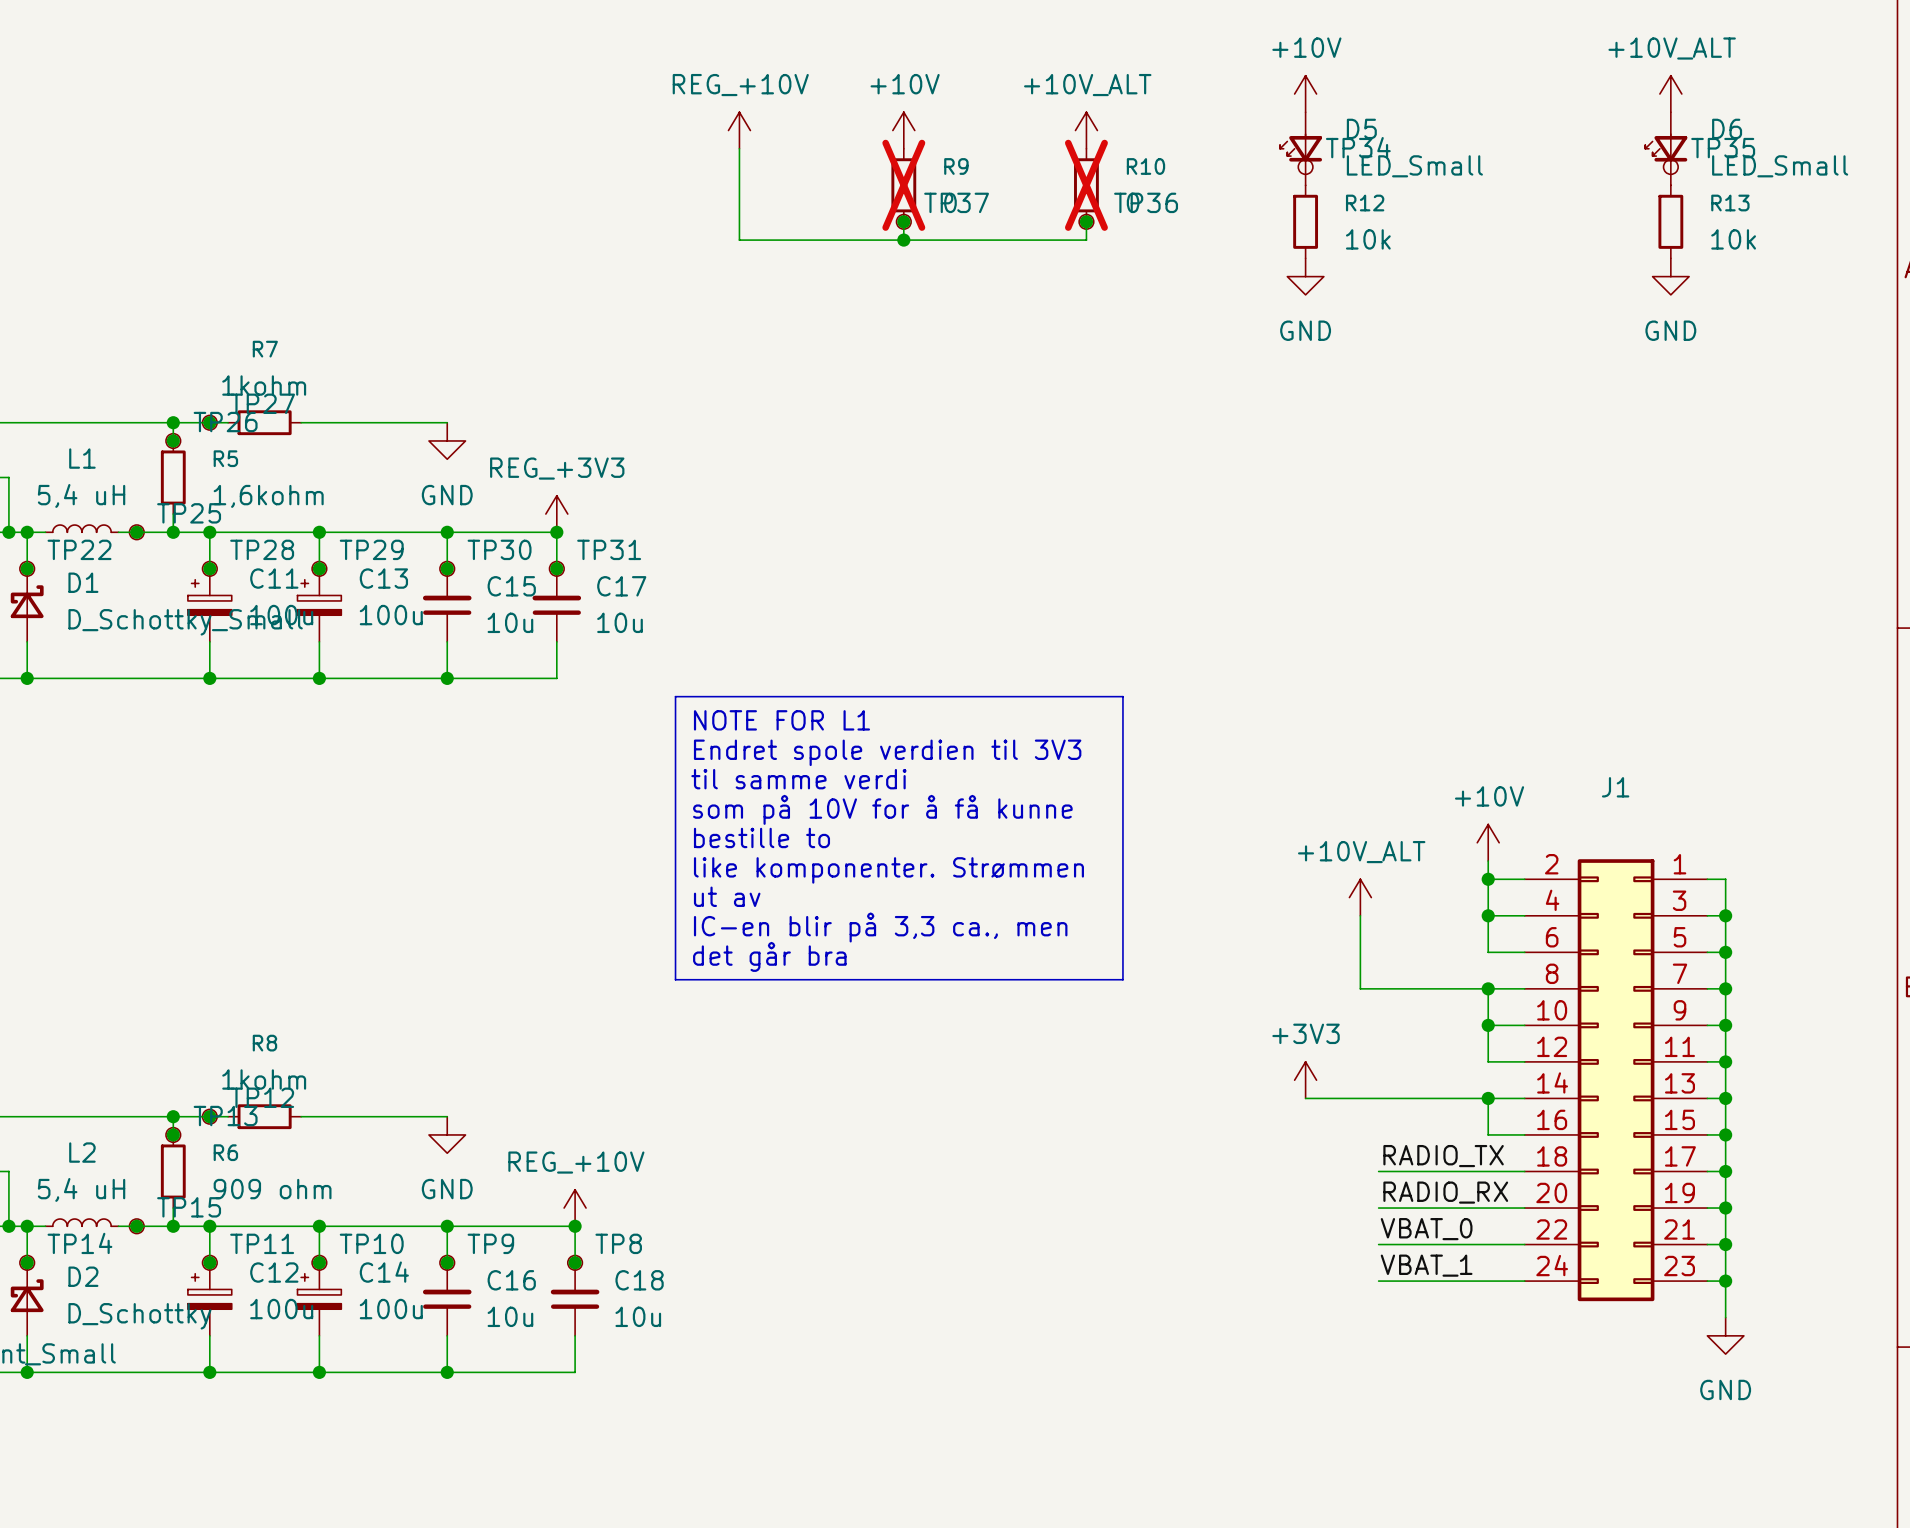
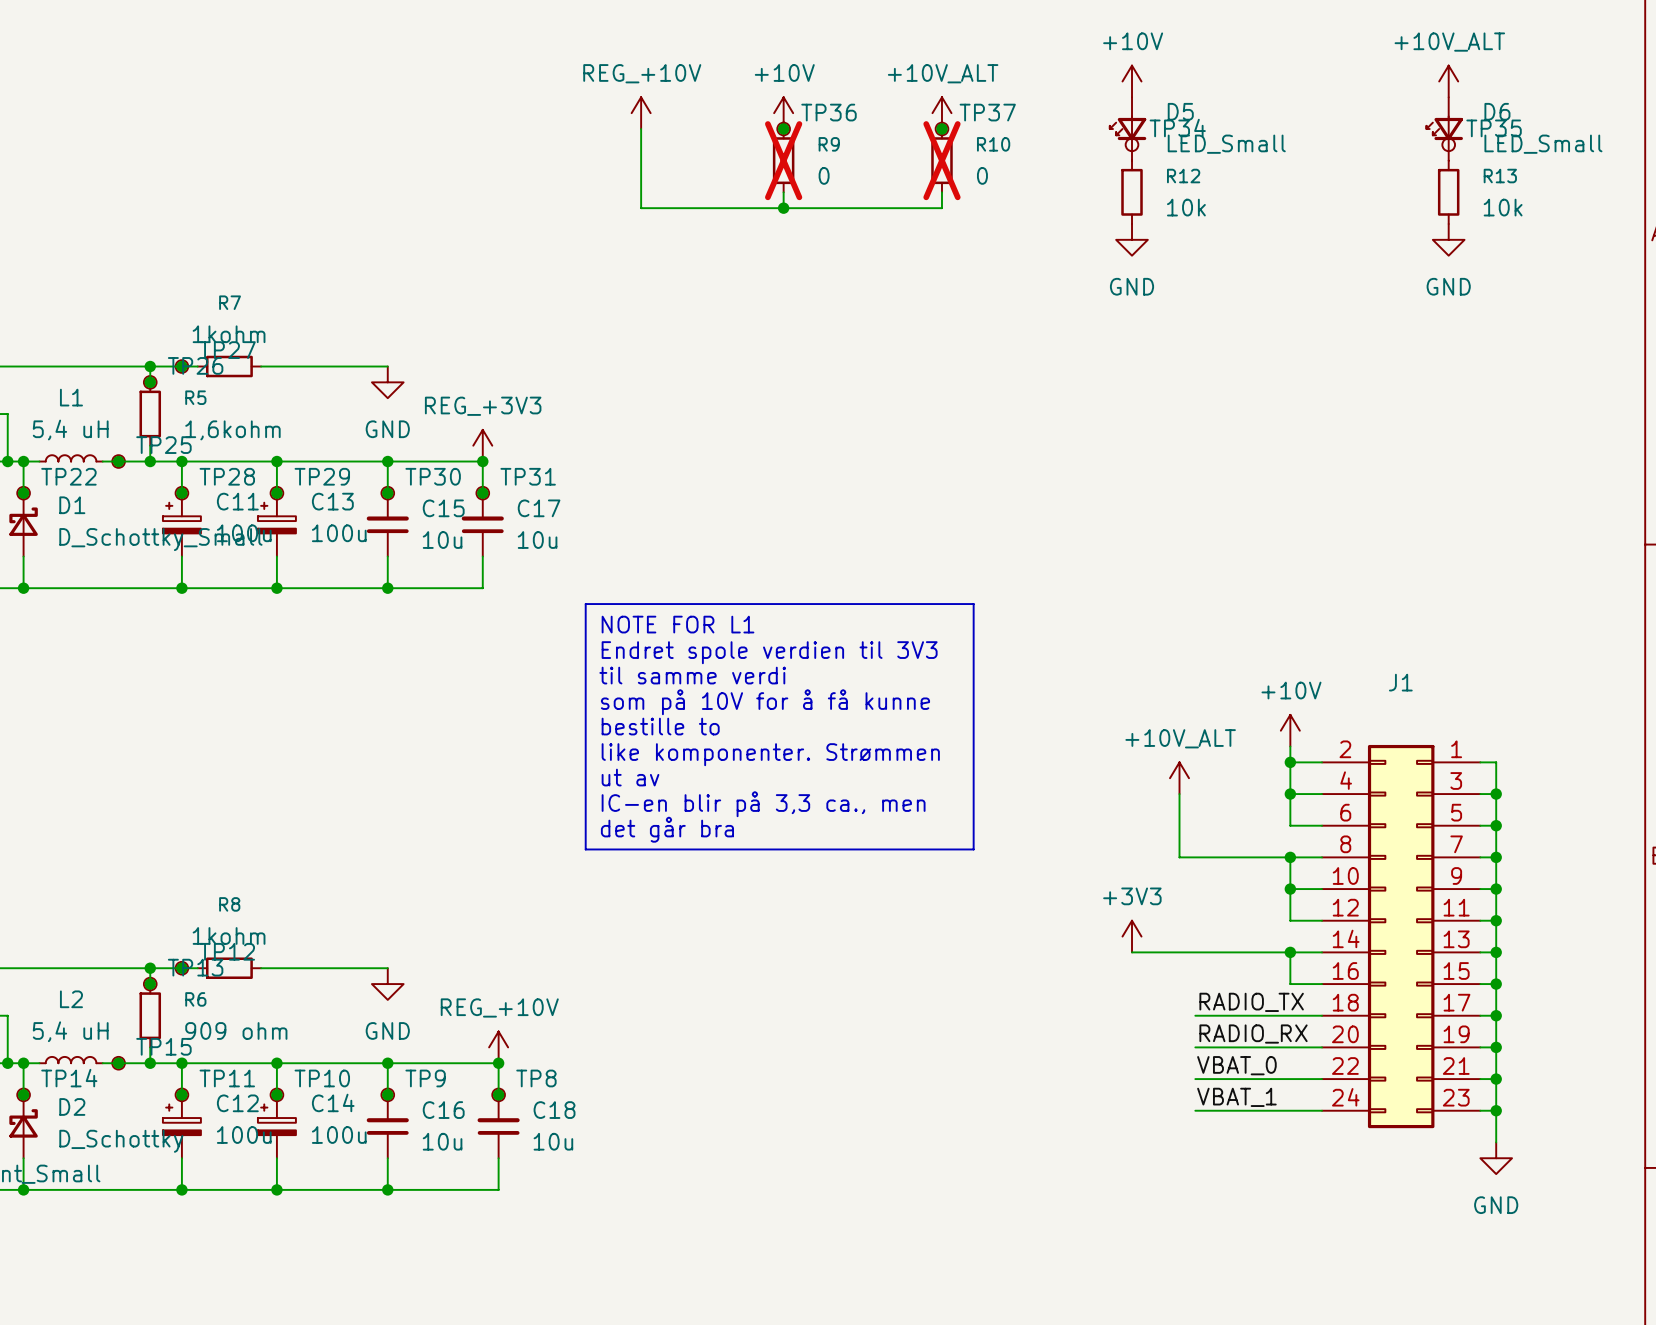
TP36 name position: TP36 (1146, 202) -> TP36 (829, 112)
junction position: (903, 221) -> (783, 128)
TP37 position: (903, 221) -> (941, 128)
junction position: (1086, 221) -> (941, 128)
TP36 position: (1086, 221) -> (783, 128)

